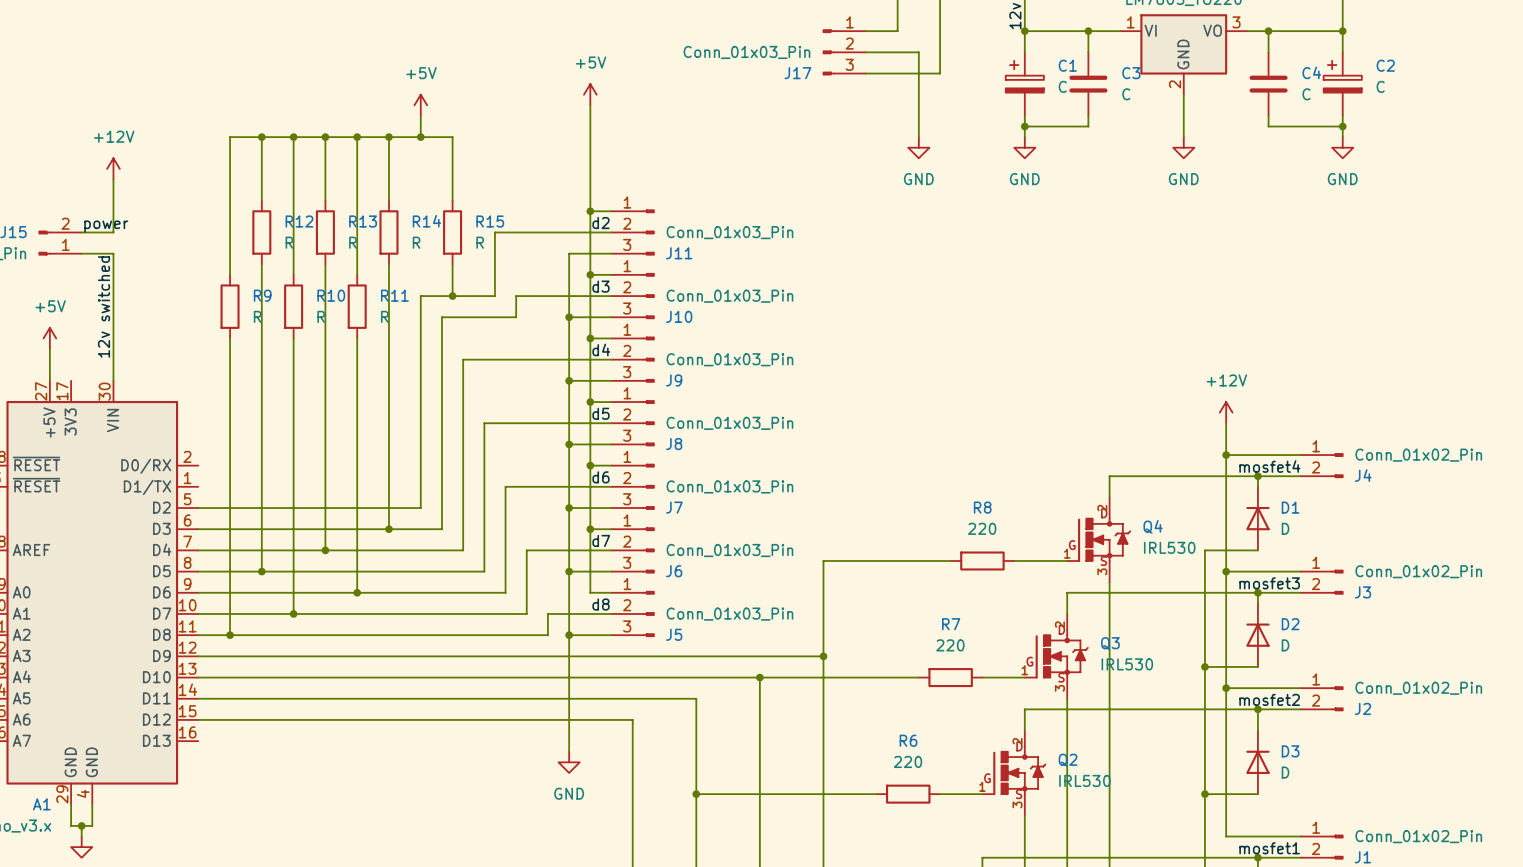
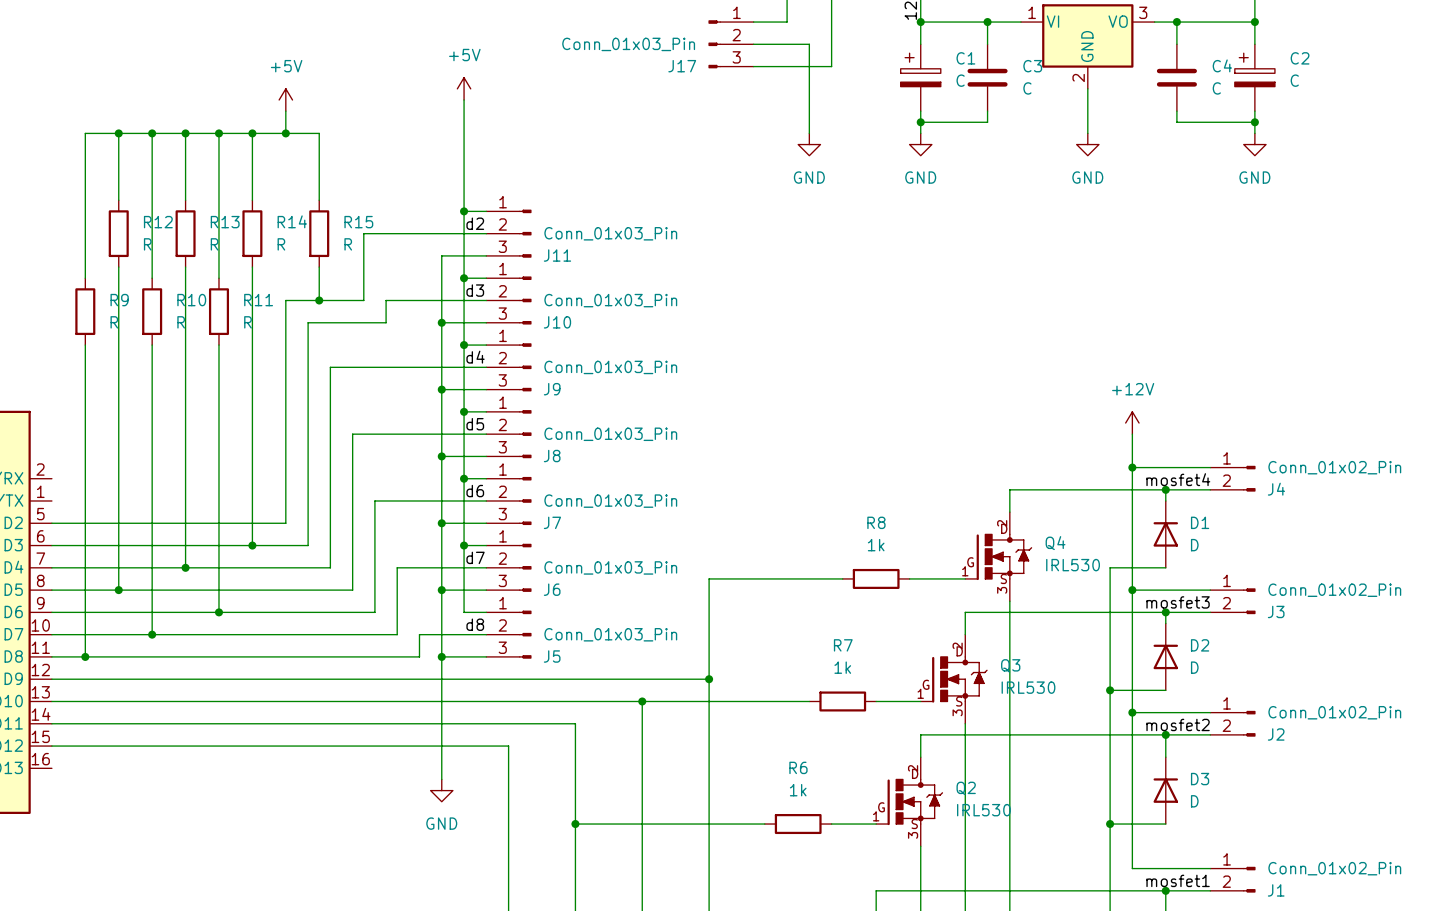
R8 value: 220 (982, 528) -> 1k (876, 545)
R7 value: 220 (950, 645) -> 1k (842, 667)
R6 value: 220 (908, 761) -> 1k (798, 790)

